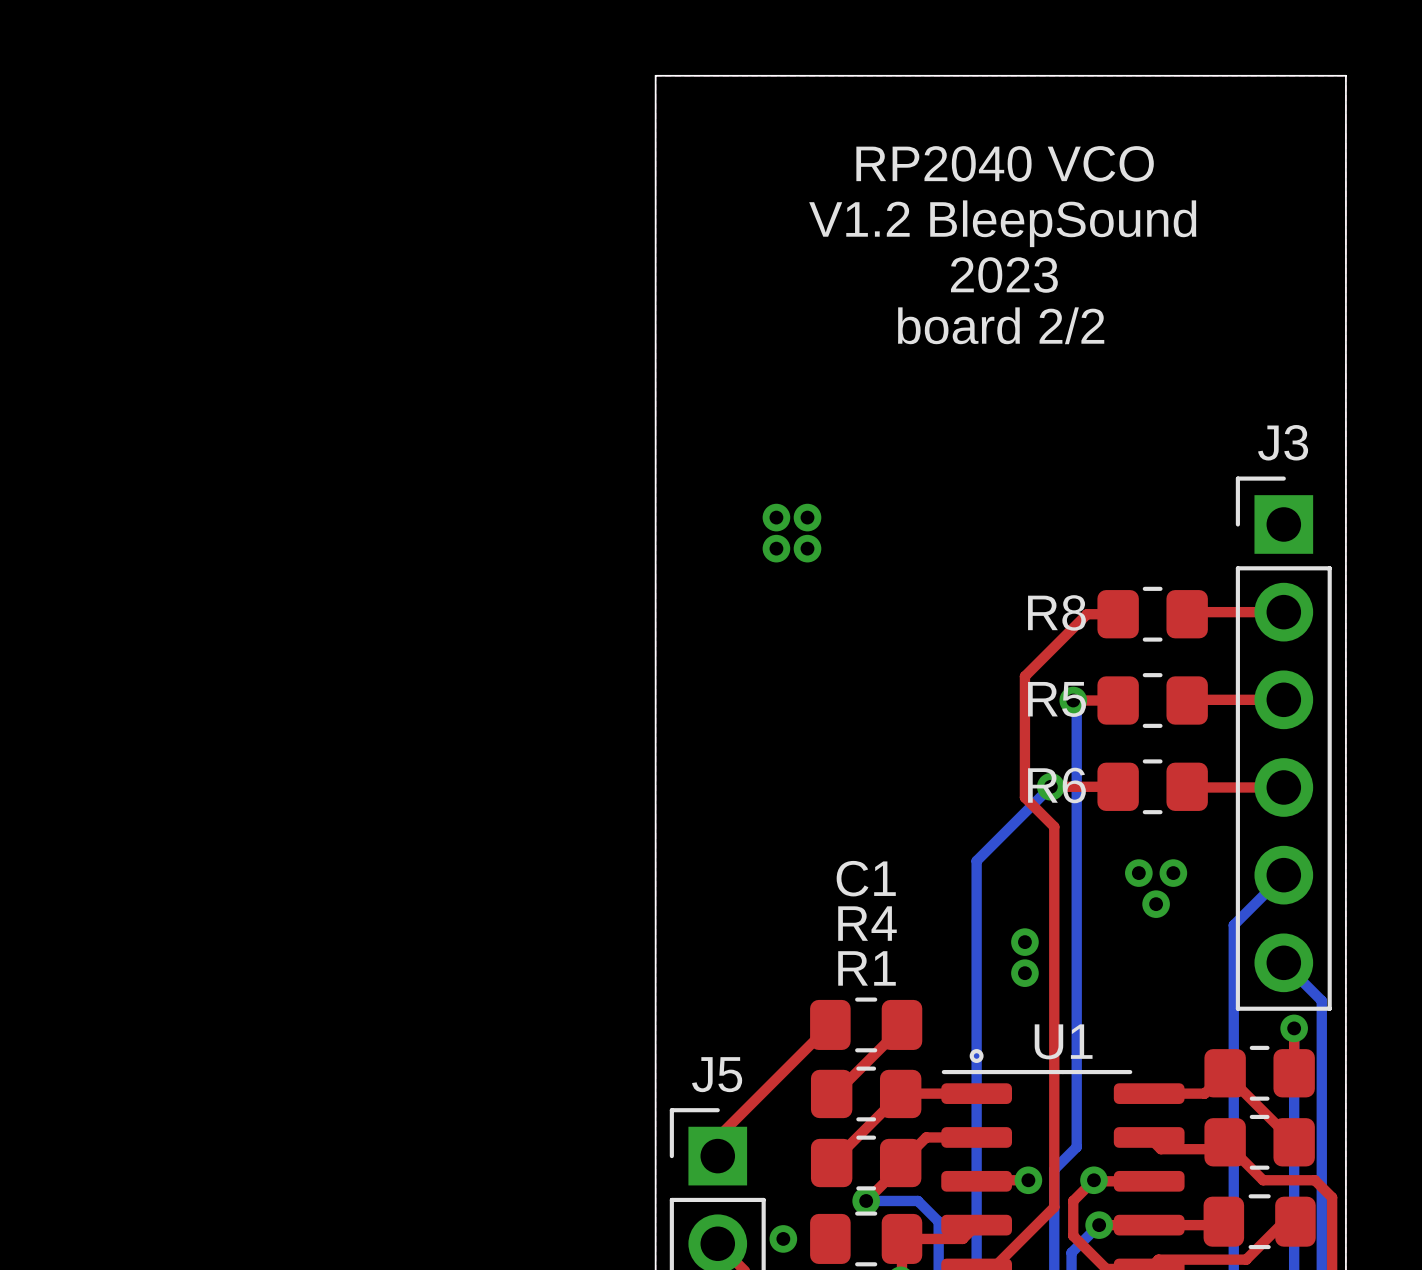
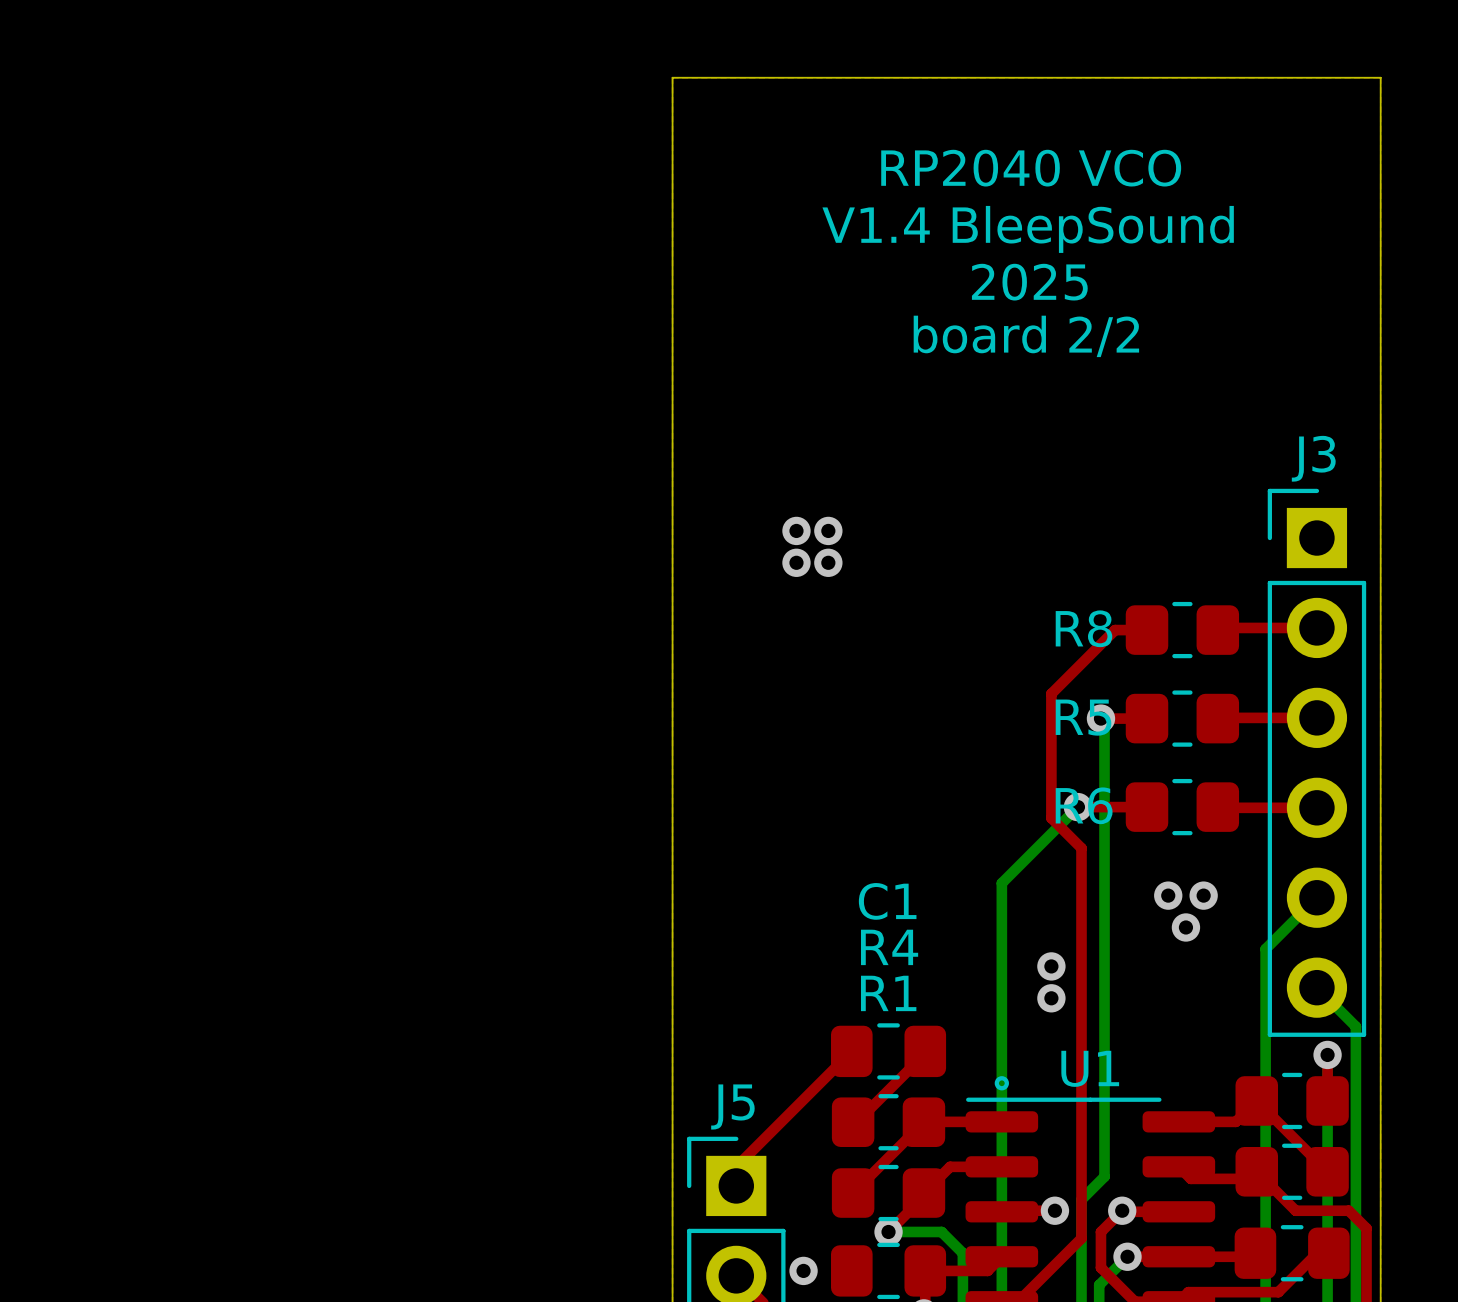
text: V1.2 BleepSound (1002, 223) -> V1.4 BleepSound (1028, 229)
text: 2023 (1004, 275) -> 2025 (1029, 282)

